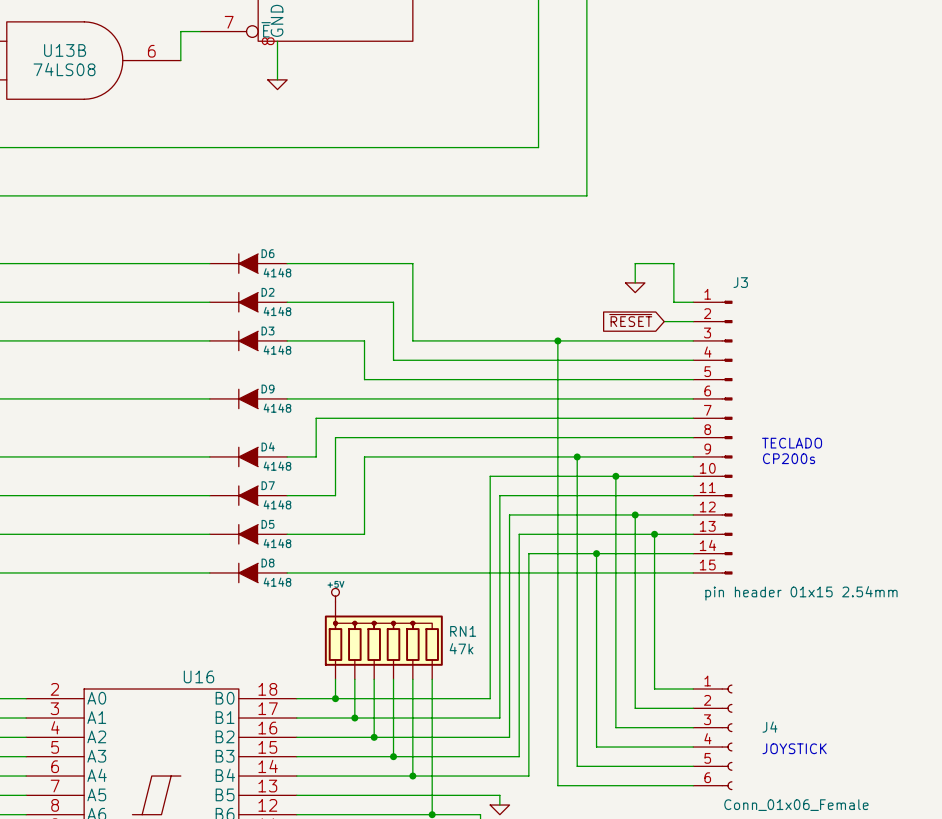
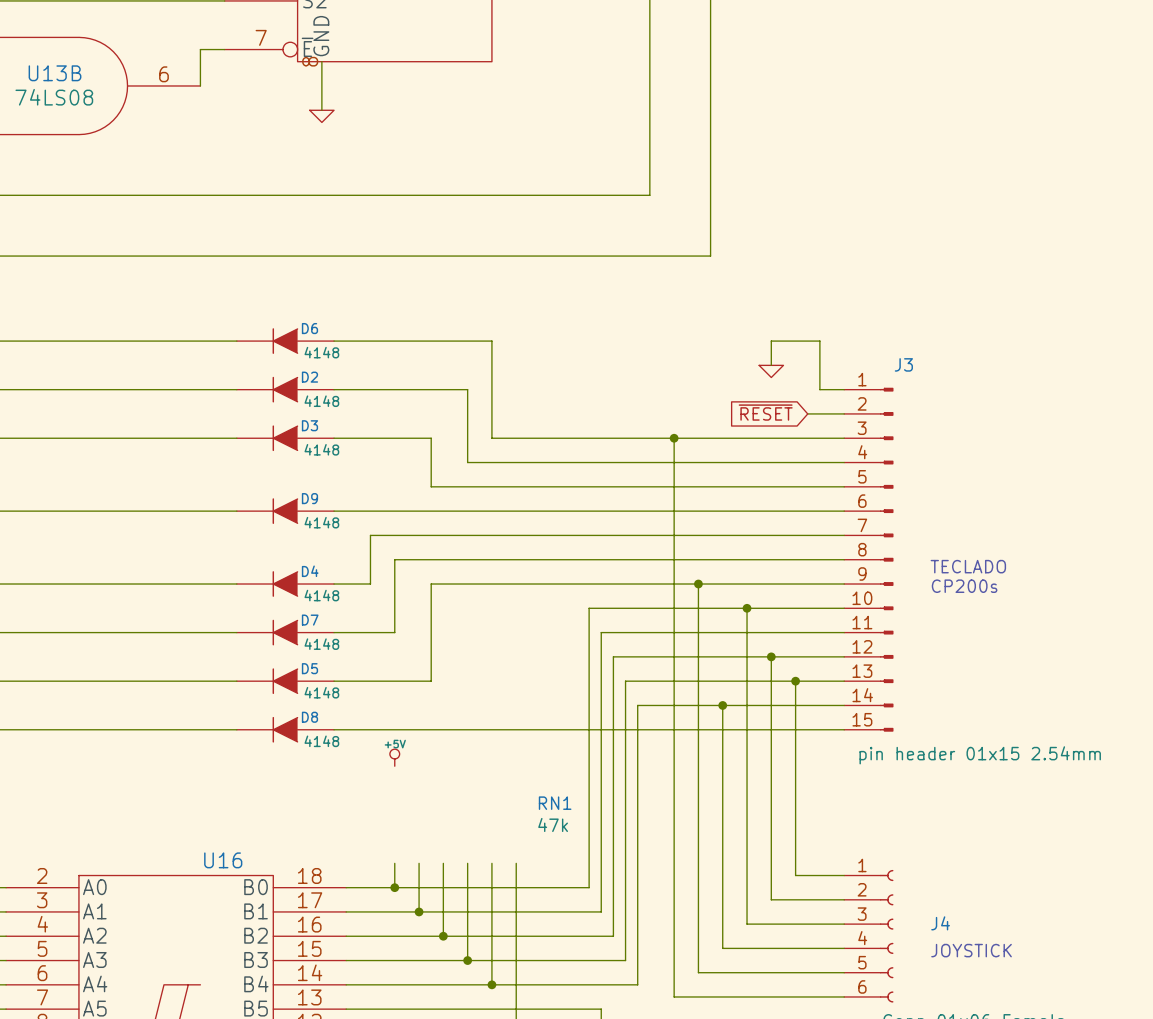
RN1 symbol: [324, 601, 443, 680] -> [538, 796, 572, 833]

